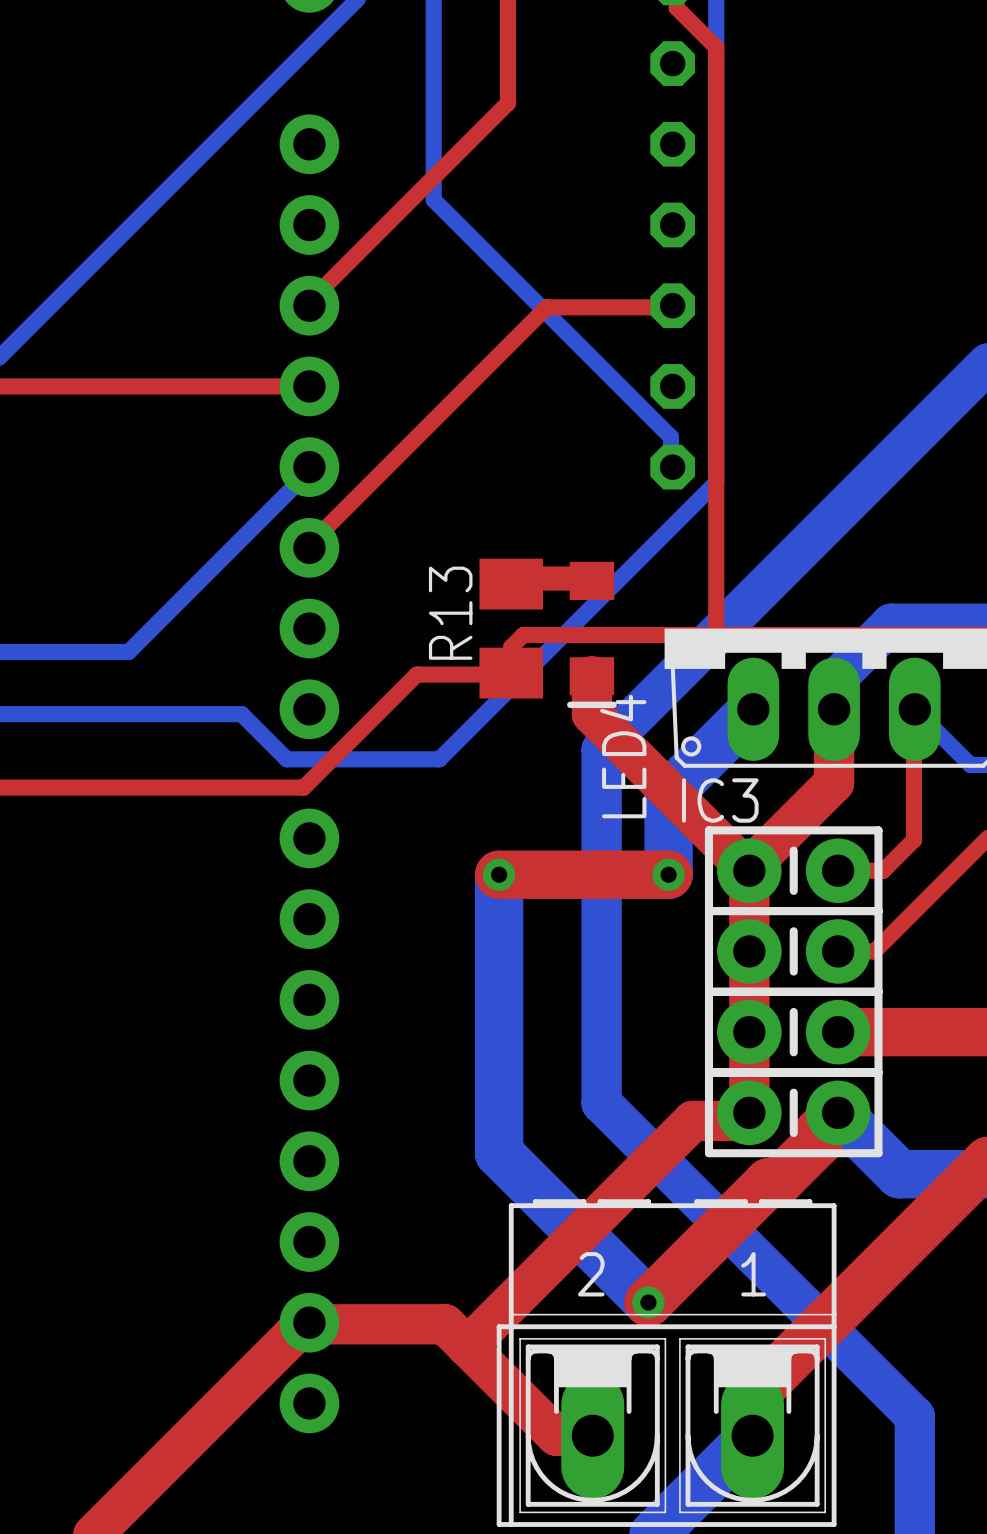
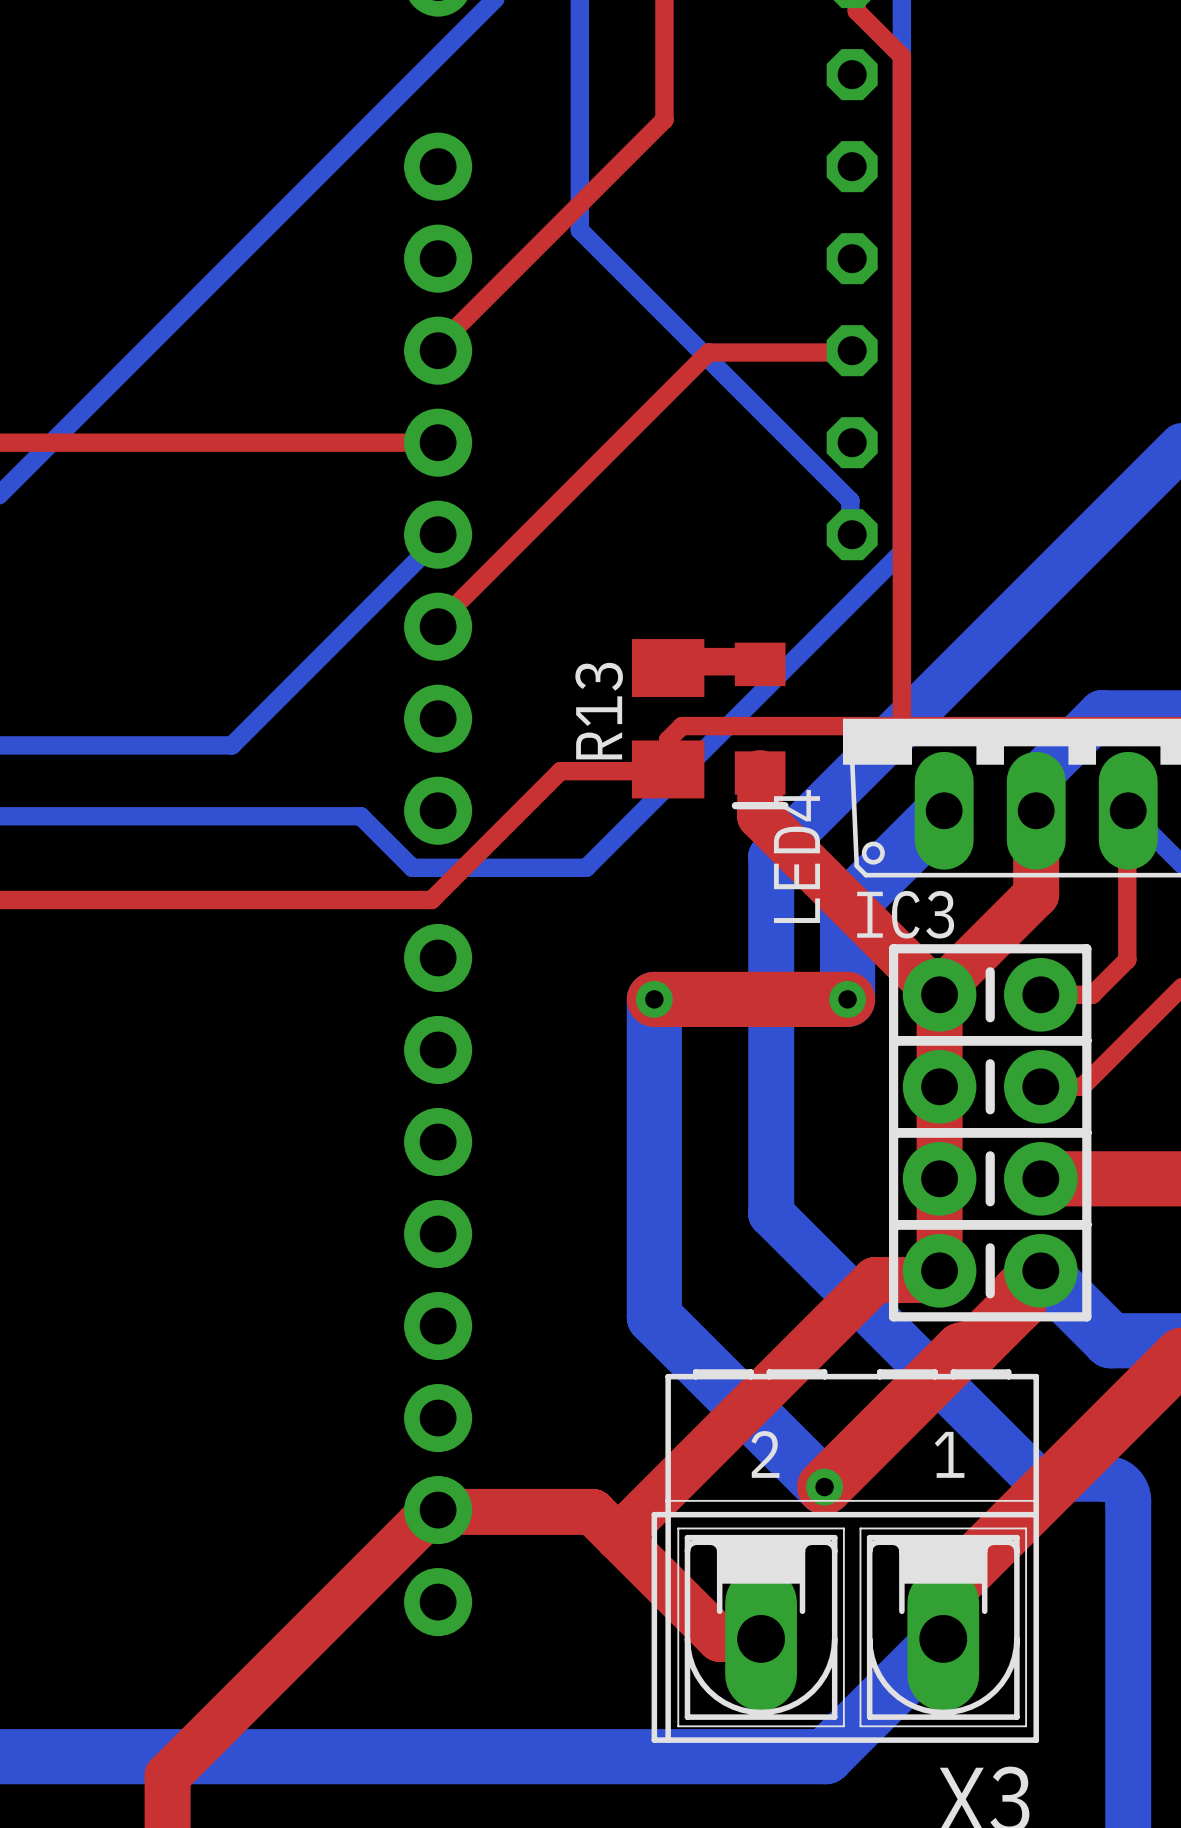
bottom track: (601, 1062) (601, 1103) (914, 1416) -> (771, 1213) (1036, 1478) (1109, 1478) (1121, 1485) (1126, 1492) (1128, 1500) (1128, 1616)

